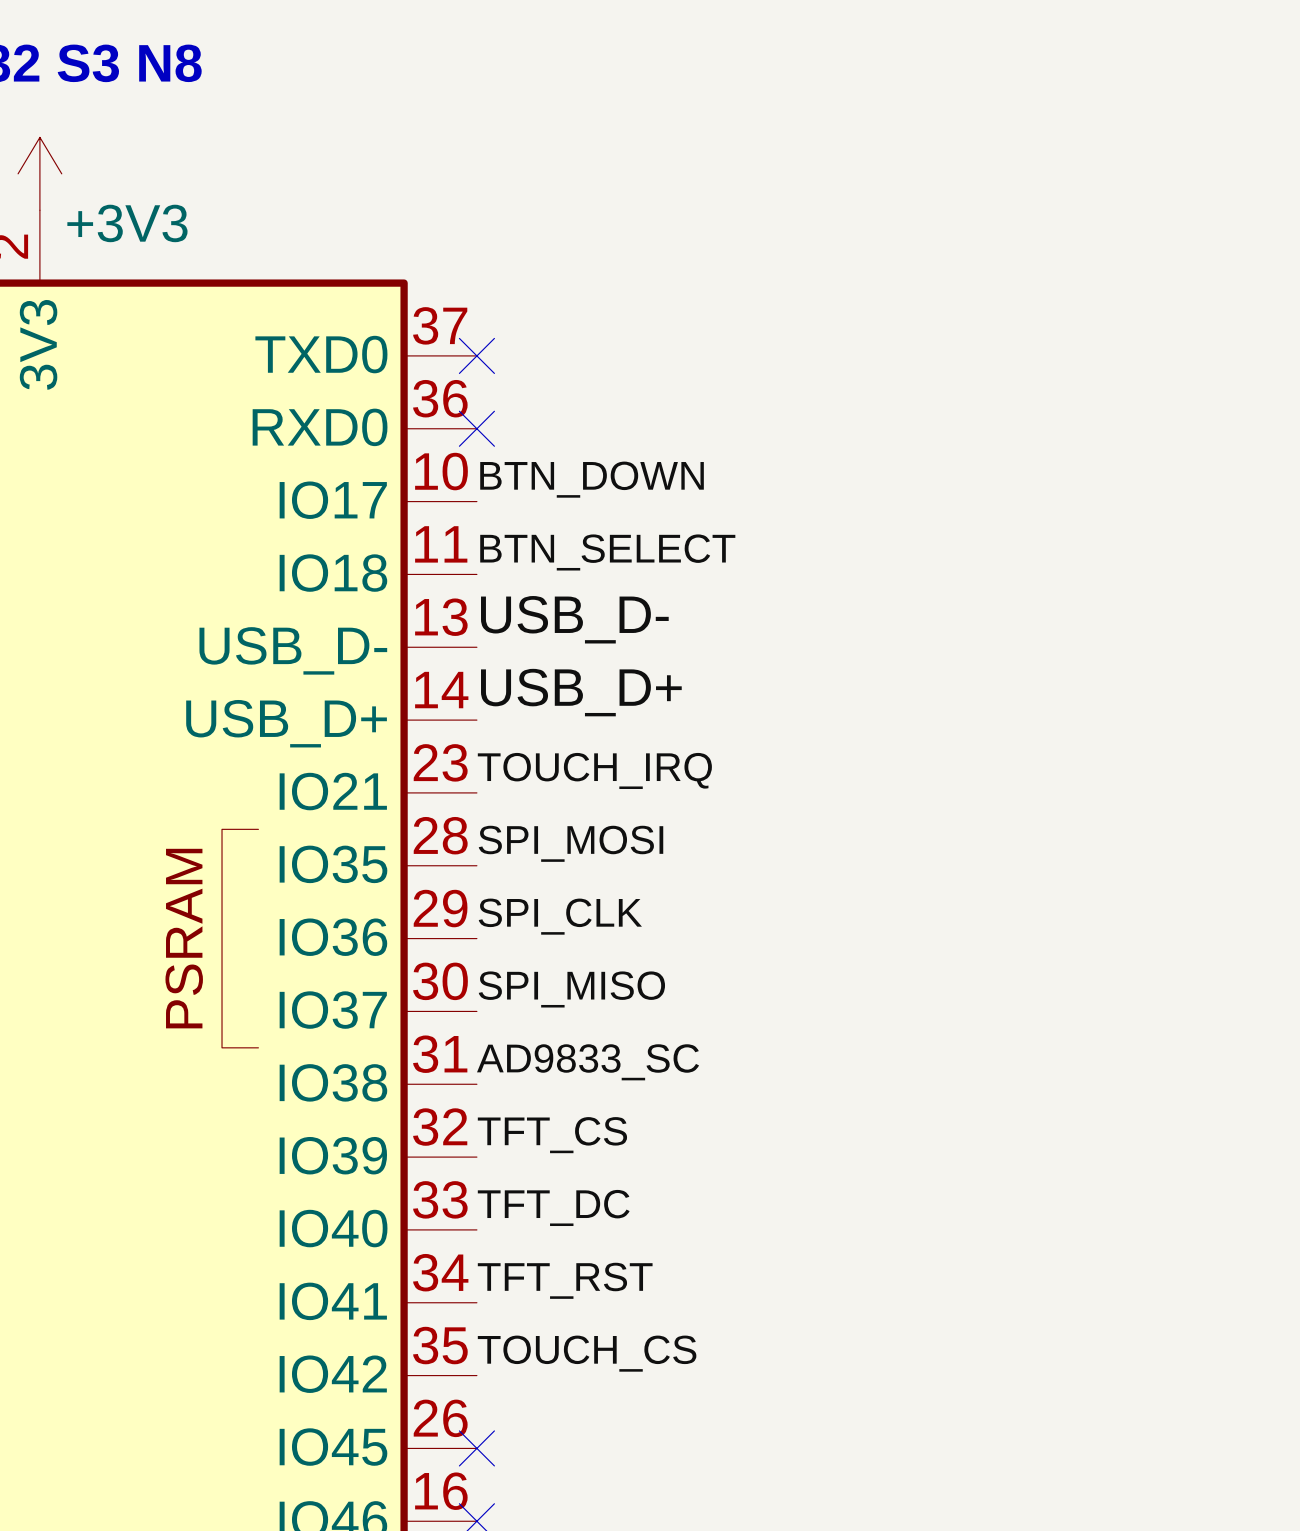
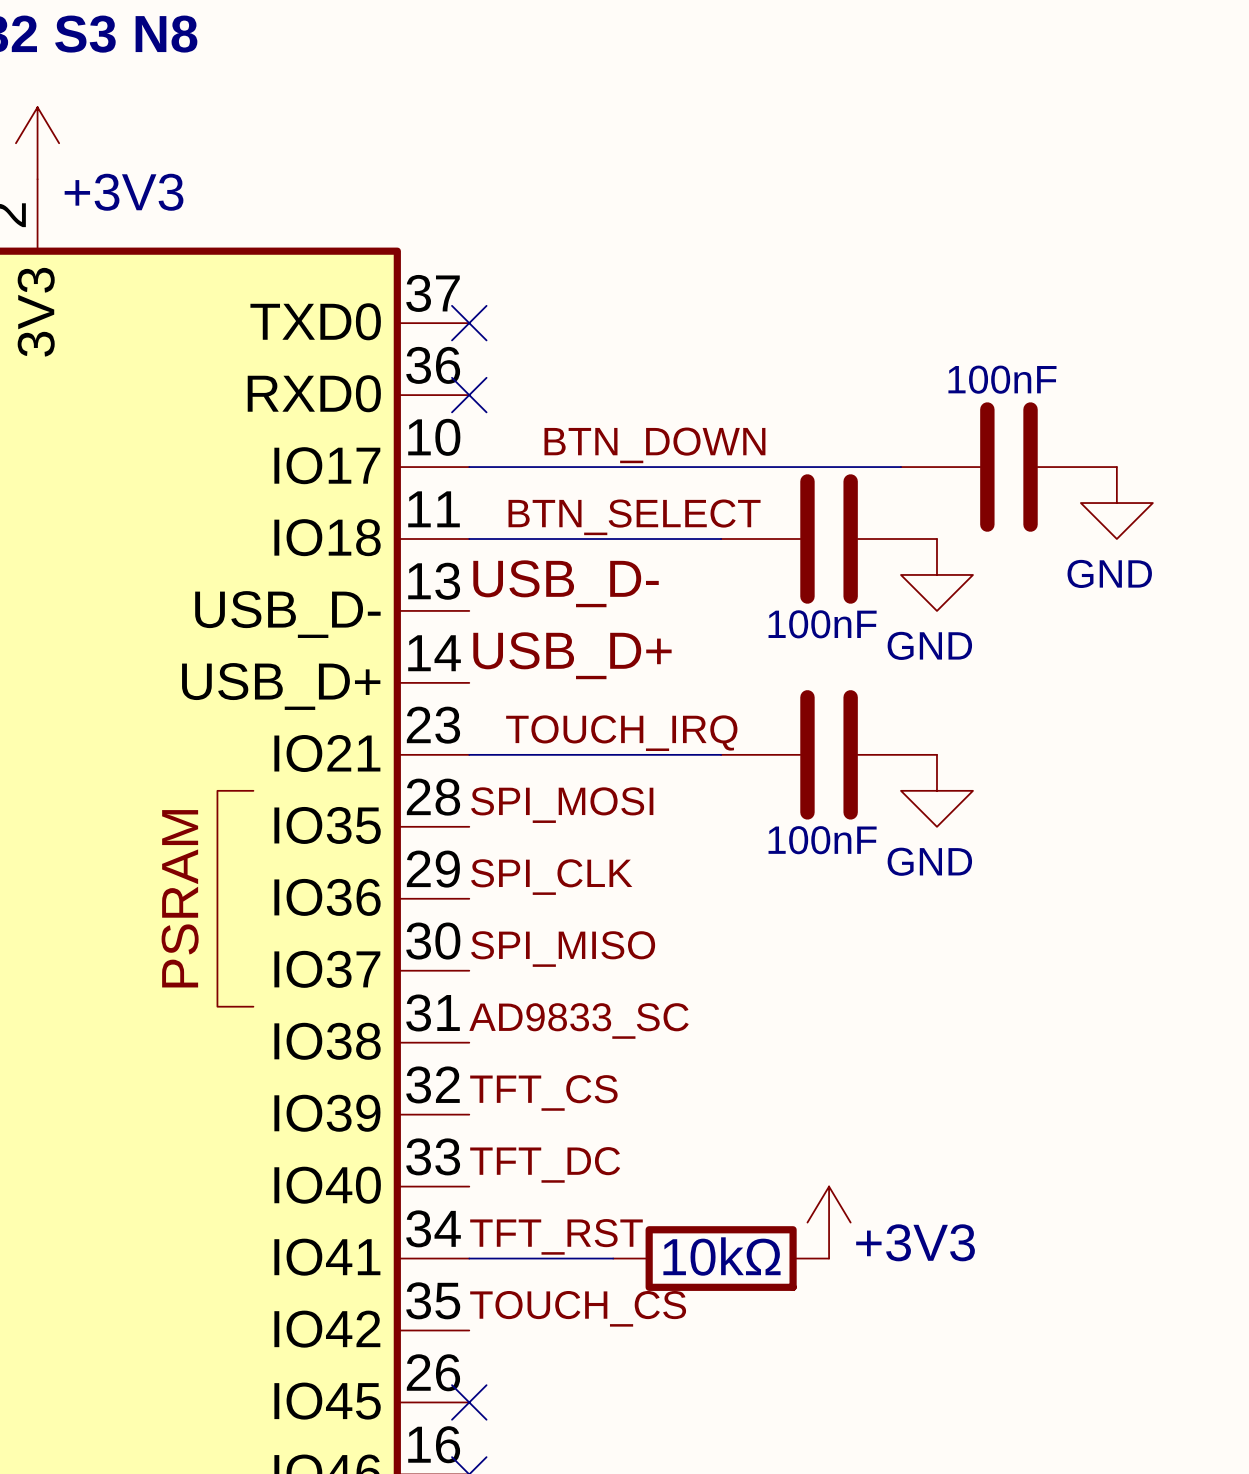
label position: BTN_DOWN (592, 479) -> BTN_DOWN (654, 445)
wire: none -> (469, 467) (901, 467)
part: none -> 100nF (1008, 467)
power symbol: none -> GND (1116, 503)
label position: BTN_SELECT (607, 552) -> BTN_SELECT (634, 517)
wire: none -> (469, 539) (721, 539)
part: none -> 100nF (829, 539)
power symbol: none -> GND (936, 574)
label position: TOUCH_IRQ (594, 770) -> TOUCH_IRQ (621, 733)
wire: none -> (469, 754) (721, 754)
part: none -> 100nF (829, 754)
power symbol: none -> GND (936, 790)
power symbol: none -> +3V3 (829, 1222)
wire: none -> (469, 1258) (613, 1258)
part: none -> 10kΩ (721, 1258)

